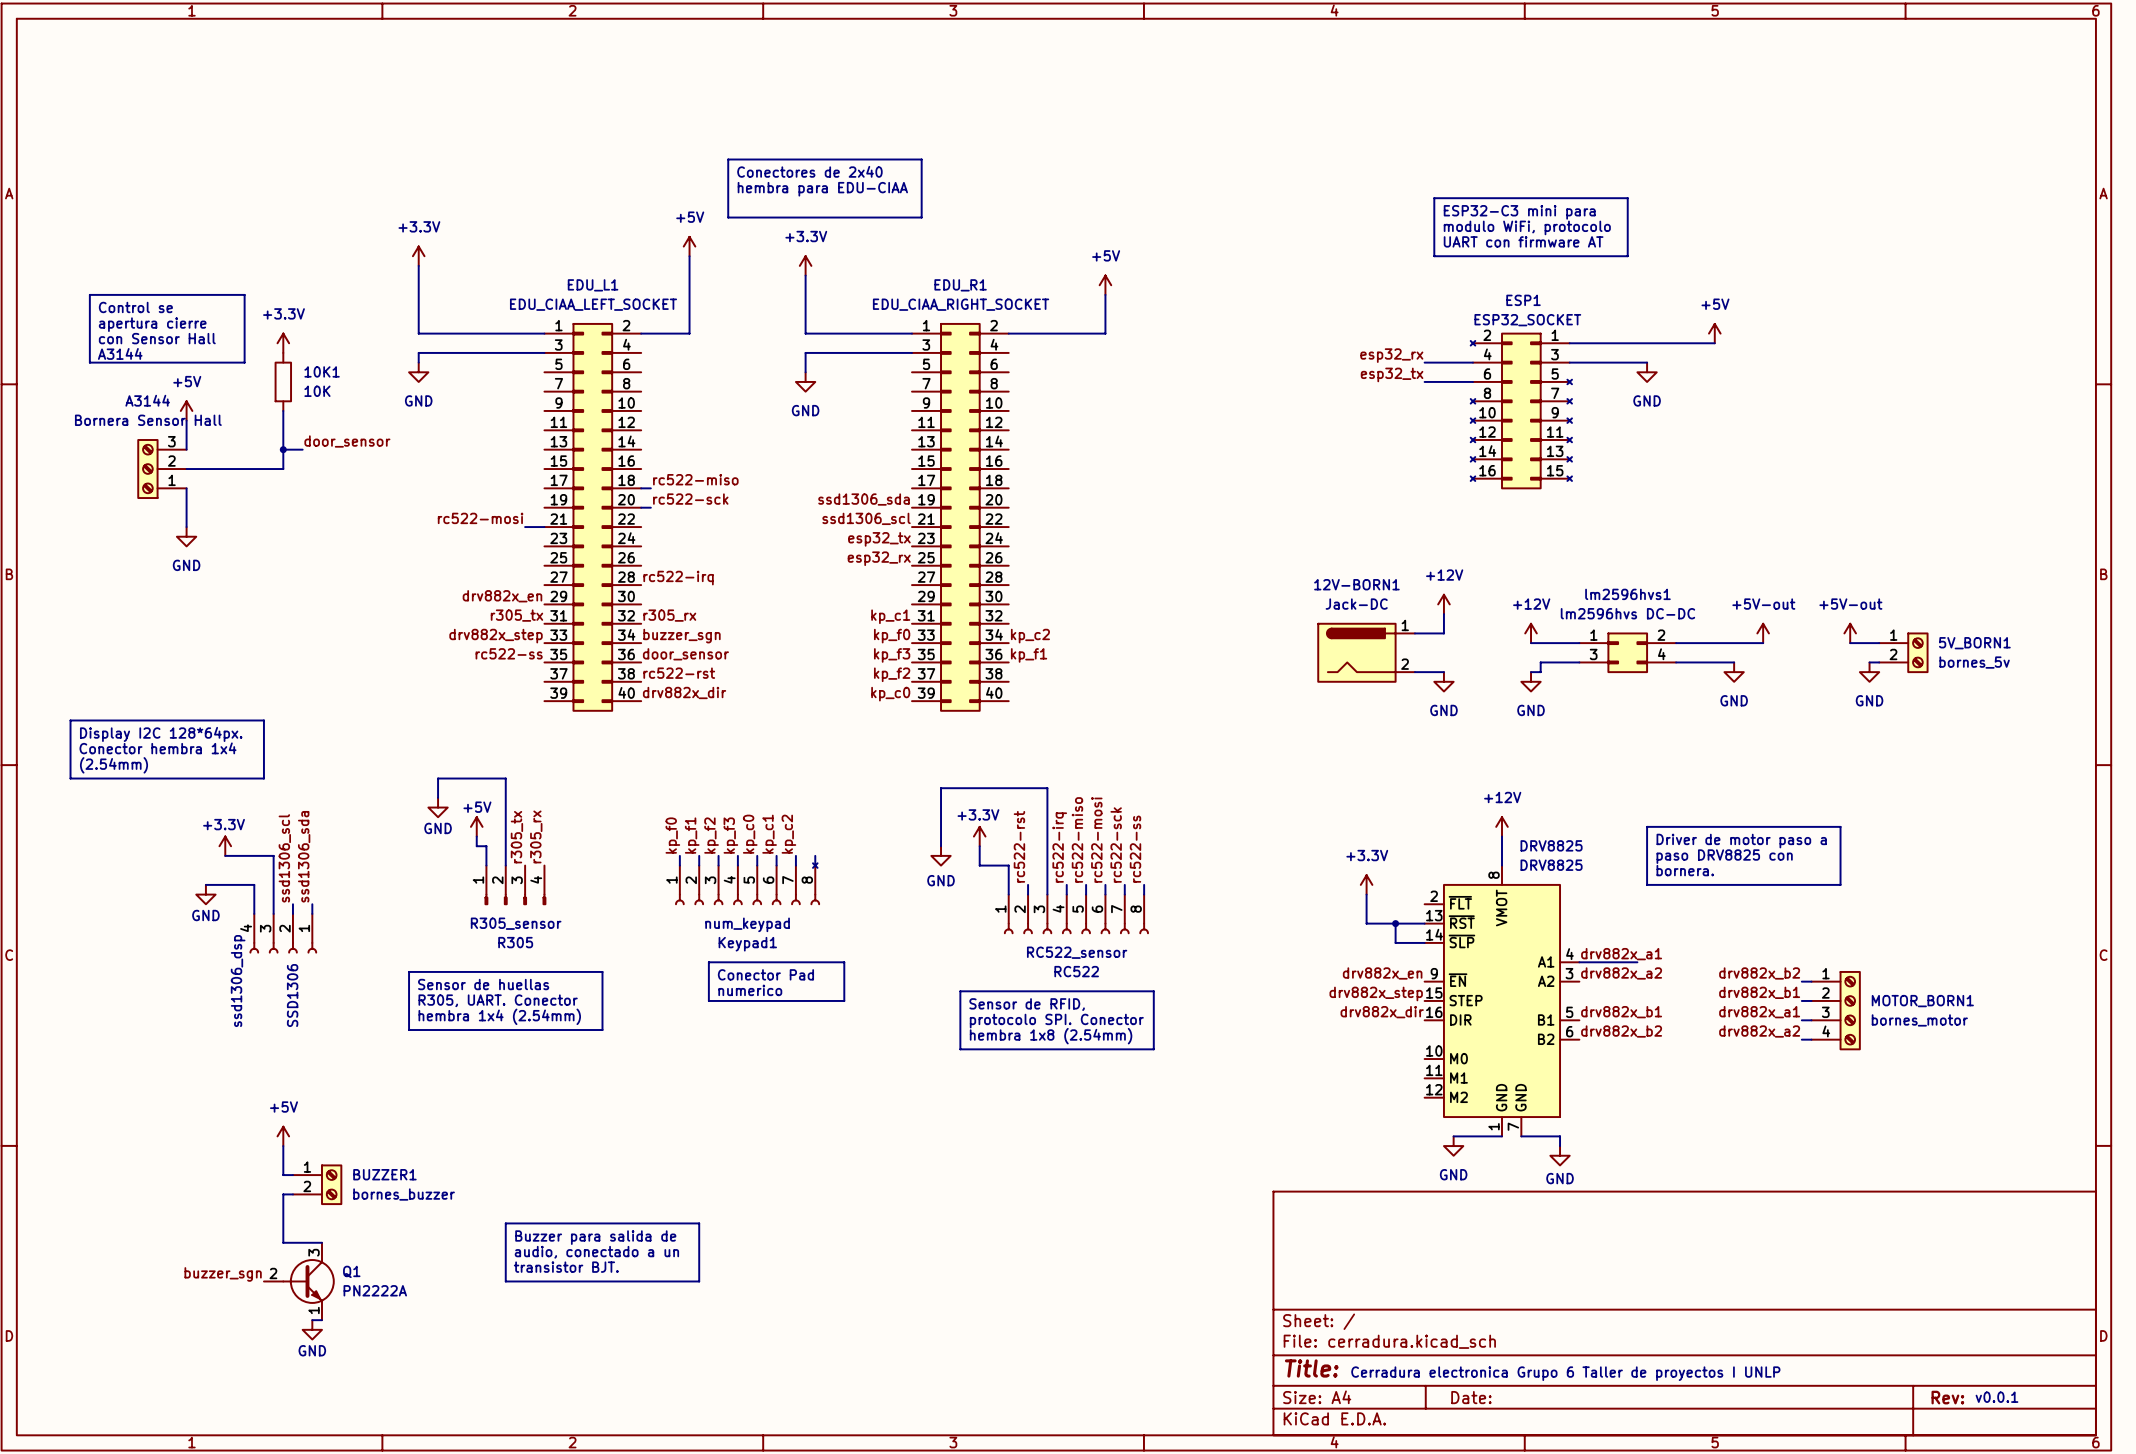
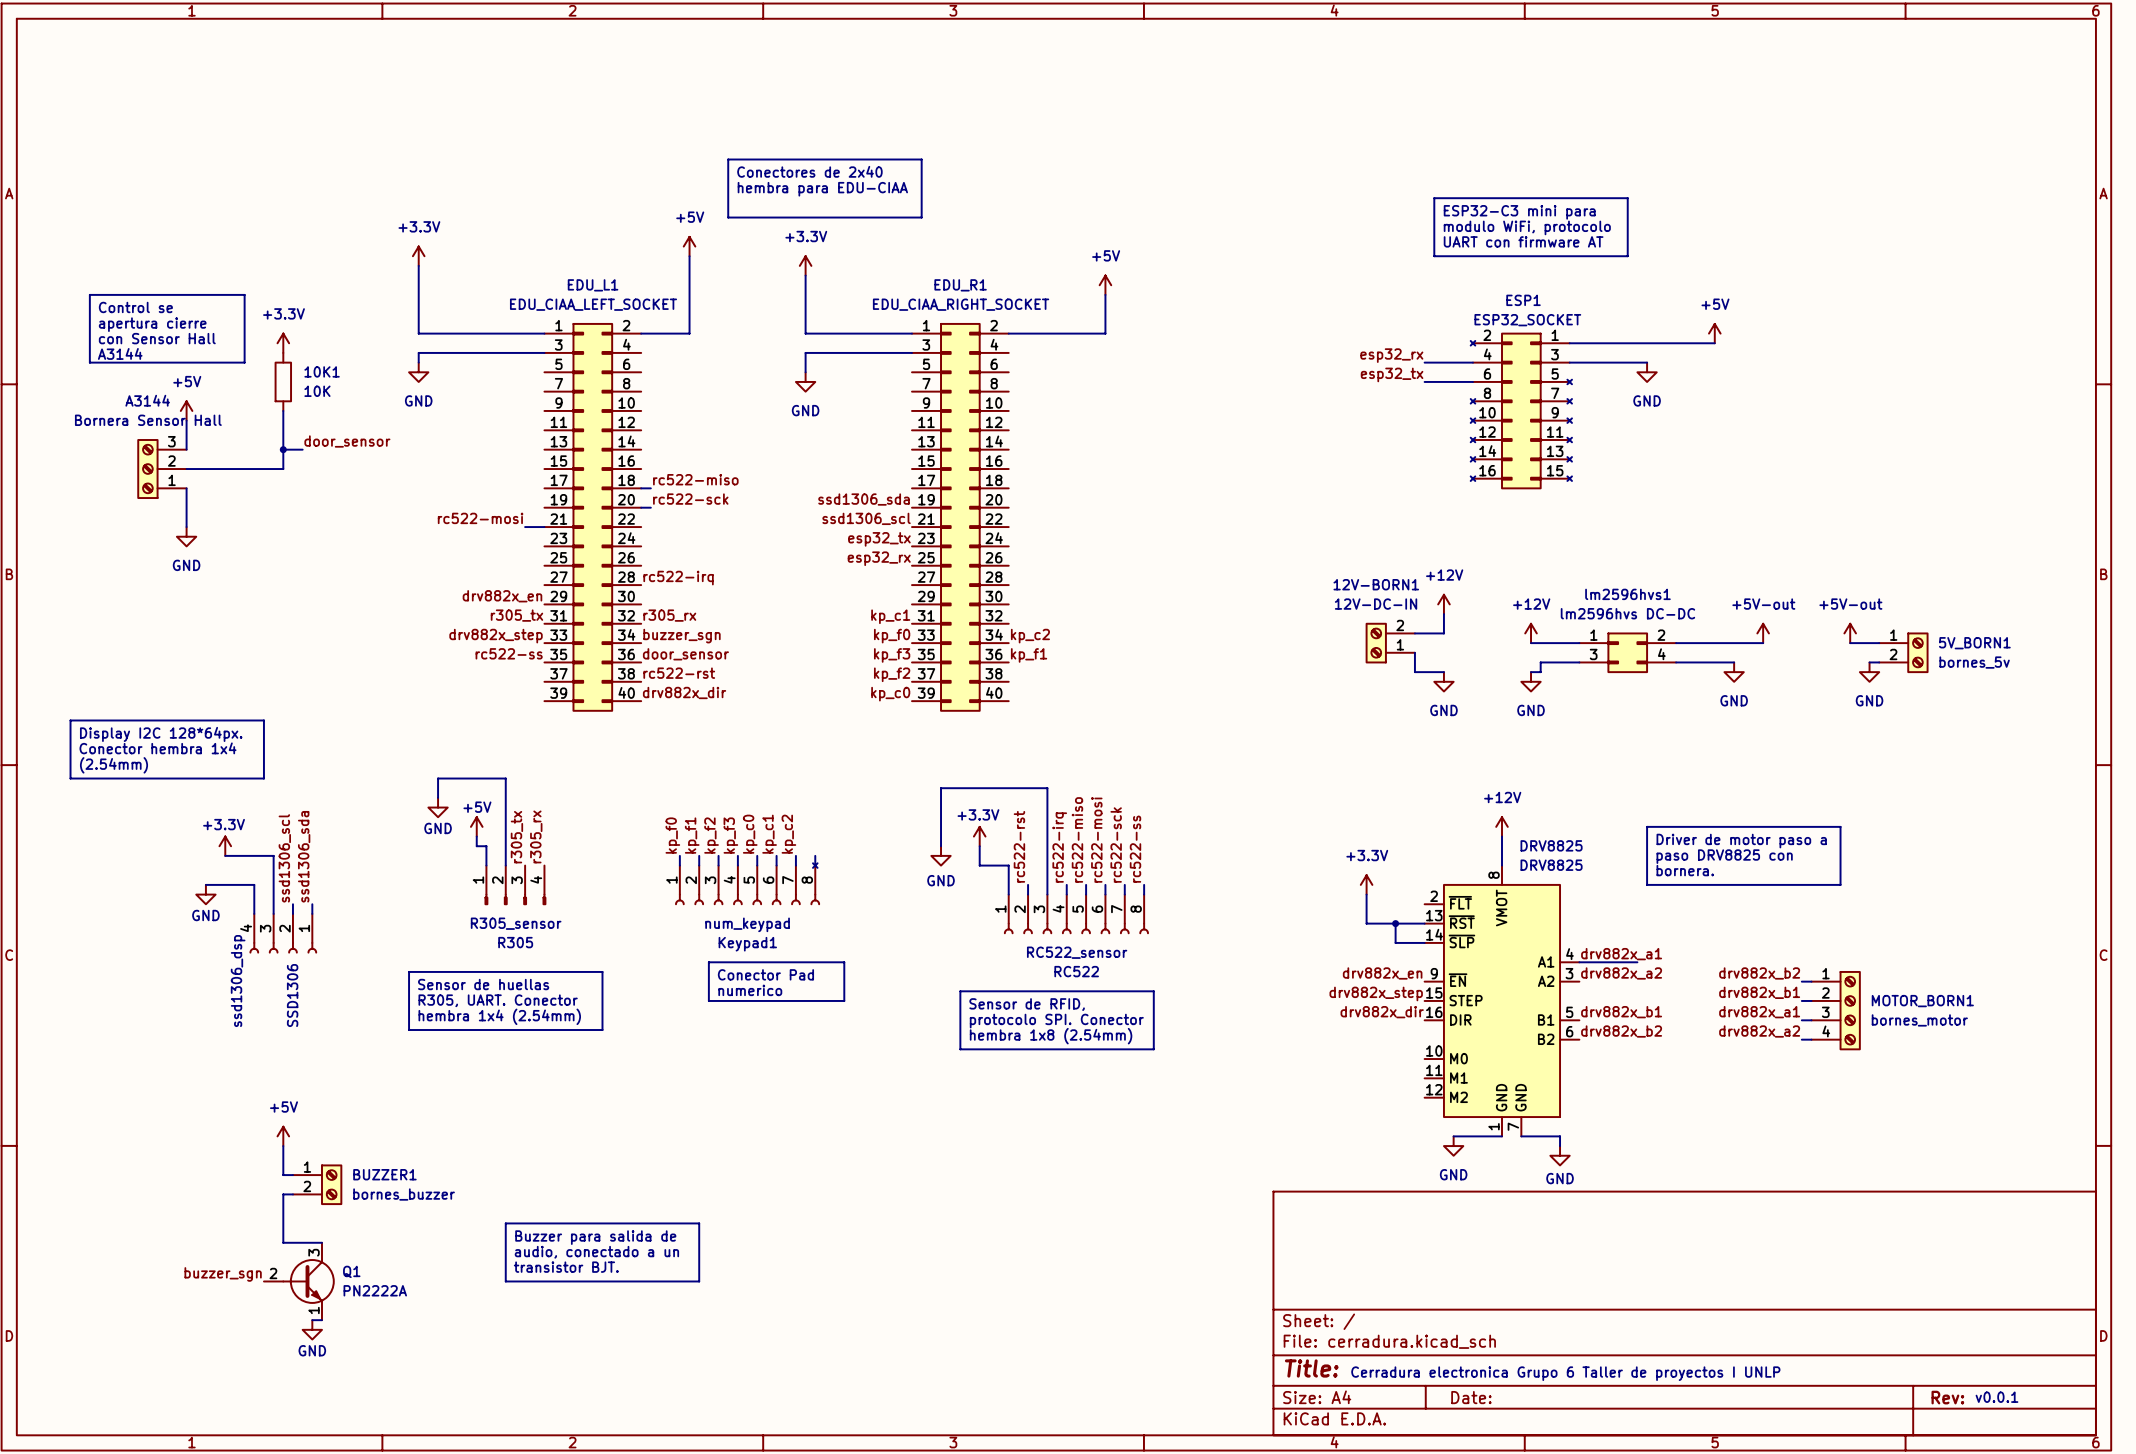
12V-BORN1 value: Jack-DC (1356, 604) -> 12V-DC-IN (1376, 604)
12V-BORN1 symbol: [1317, 622, 1415, 683] -> [1365, 622, 1415, 664]
wire: none -> (1414, 652) (1414, 672)

